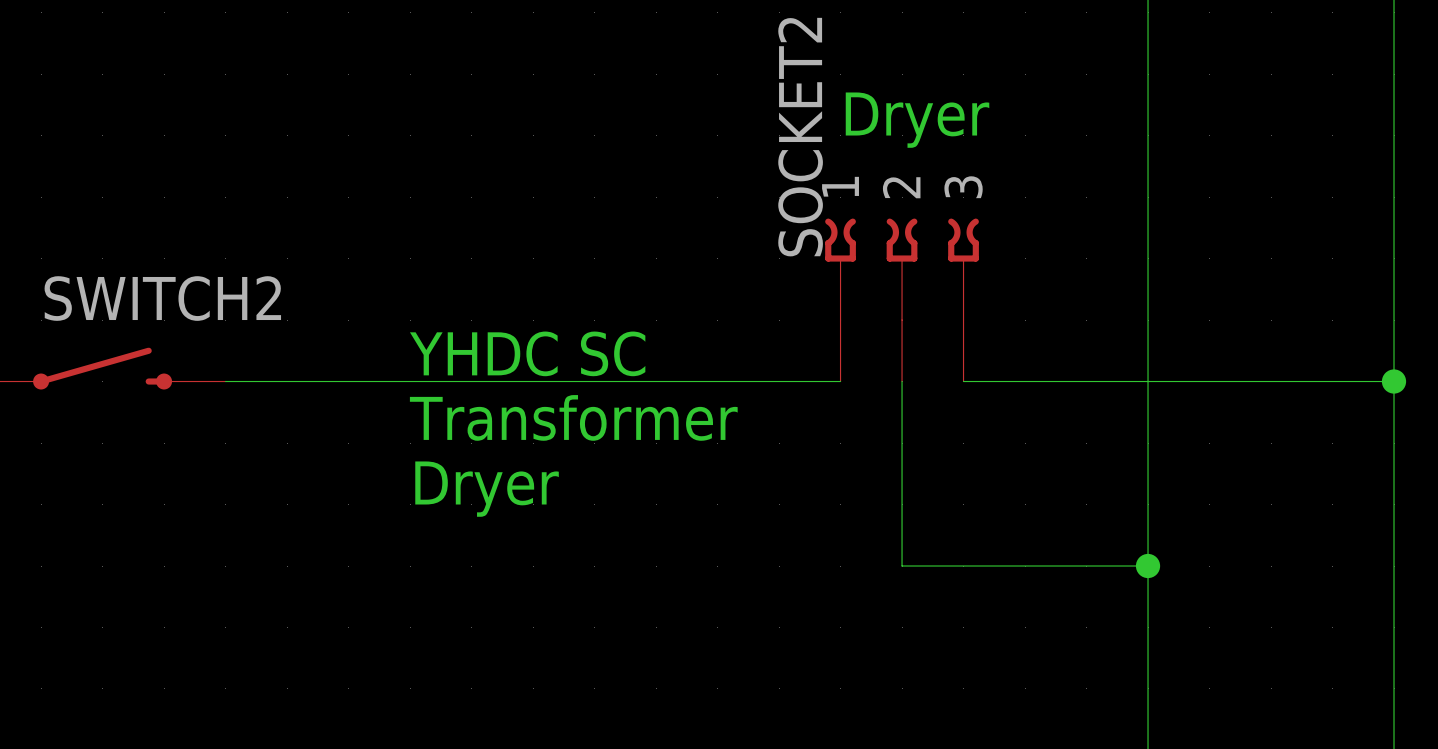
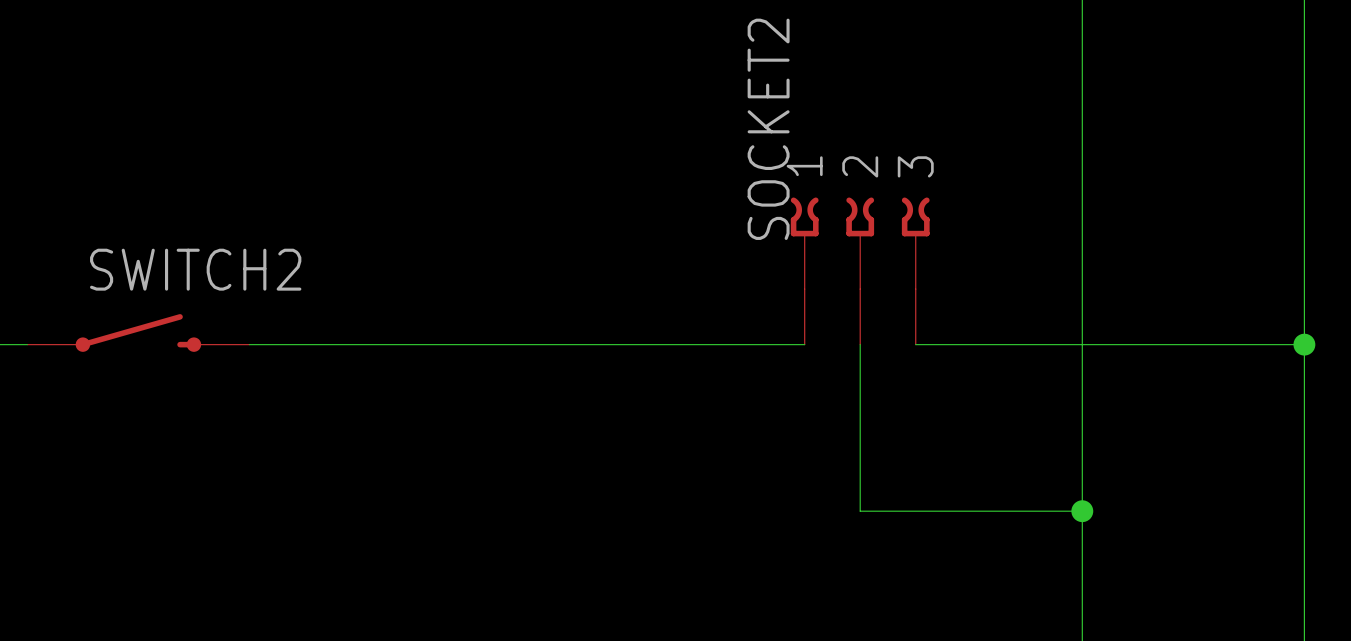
text: Dryer (917, 120) -> none
text: YHDC SC (527, 353) -> none
text: Transformer (573, 417) -> none
text: Dryer (487, 489) -> none

